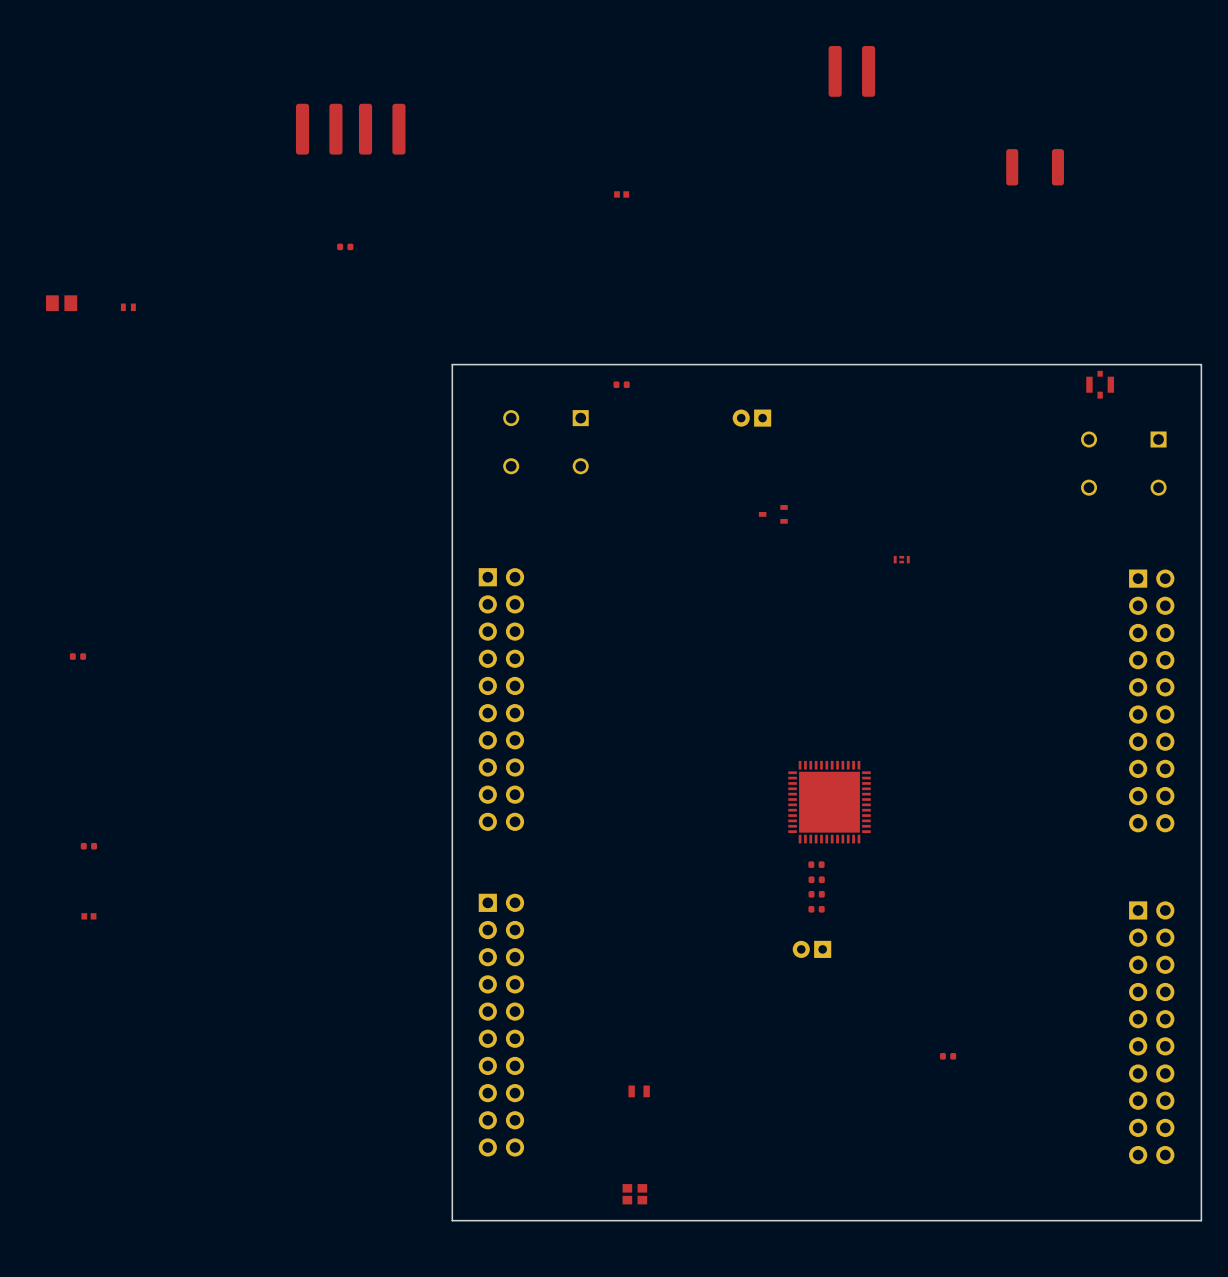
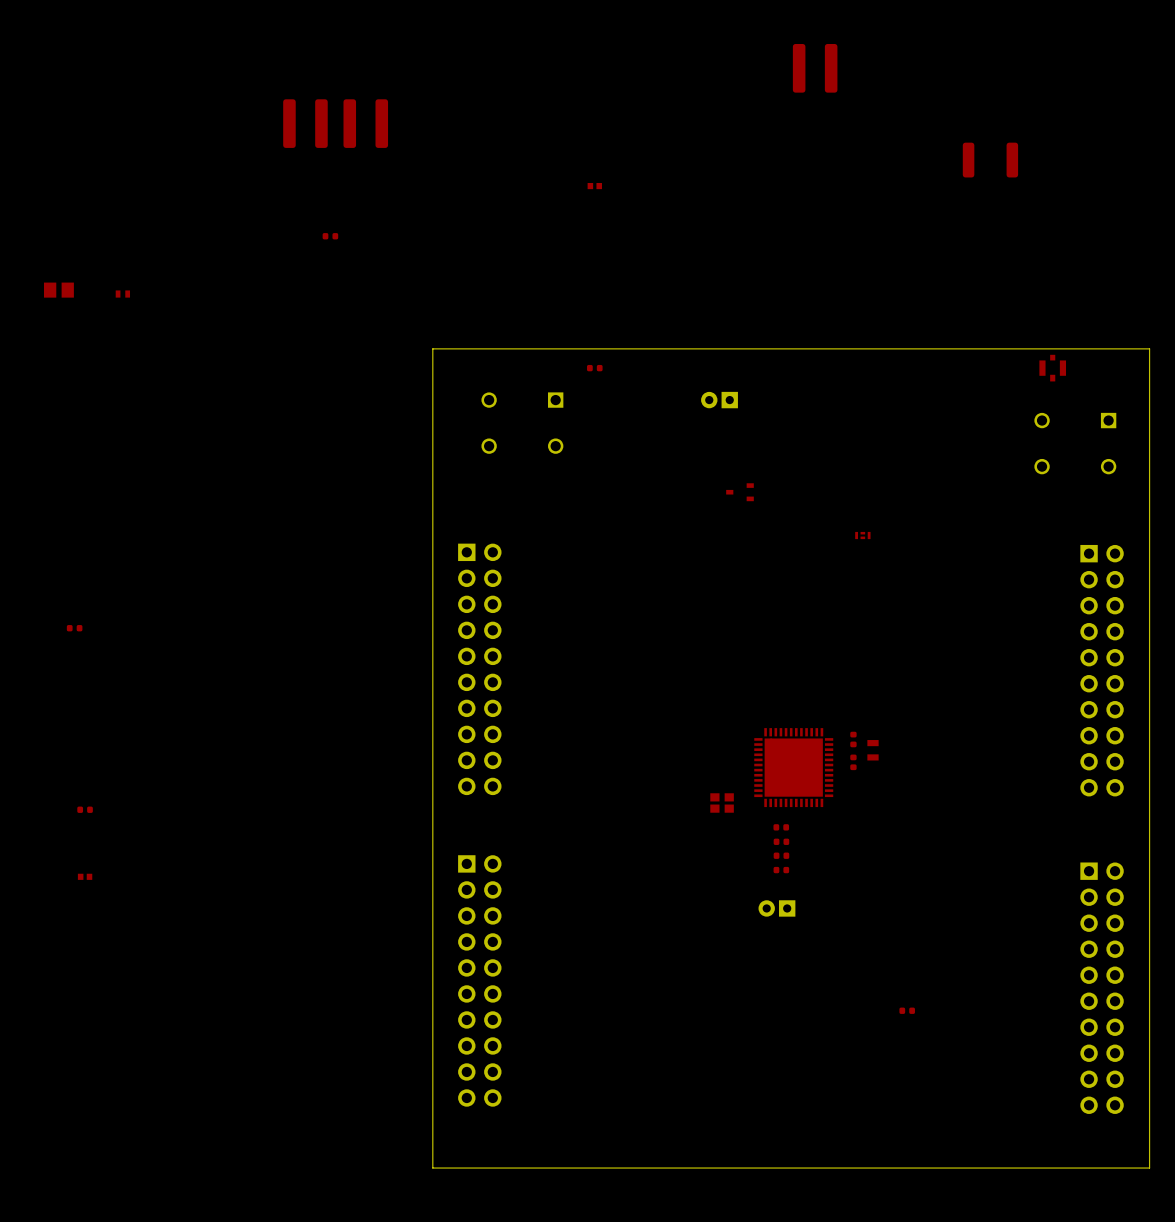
part: none -> (853, 739)
part: none -> (873, 750)
part: none -> (853, 762)
part: none -> (722, 802)
part: (639, 1091) -> none
part: (634, 1194) -> none

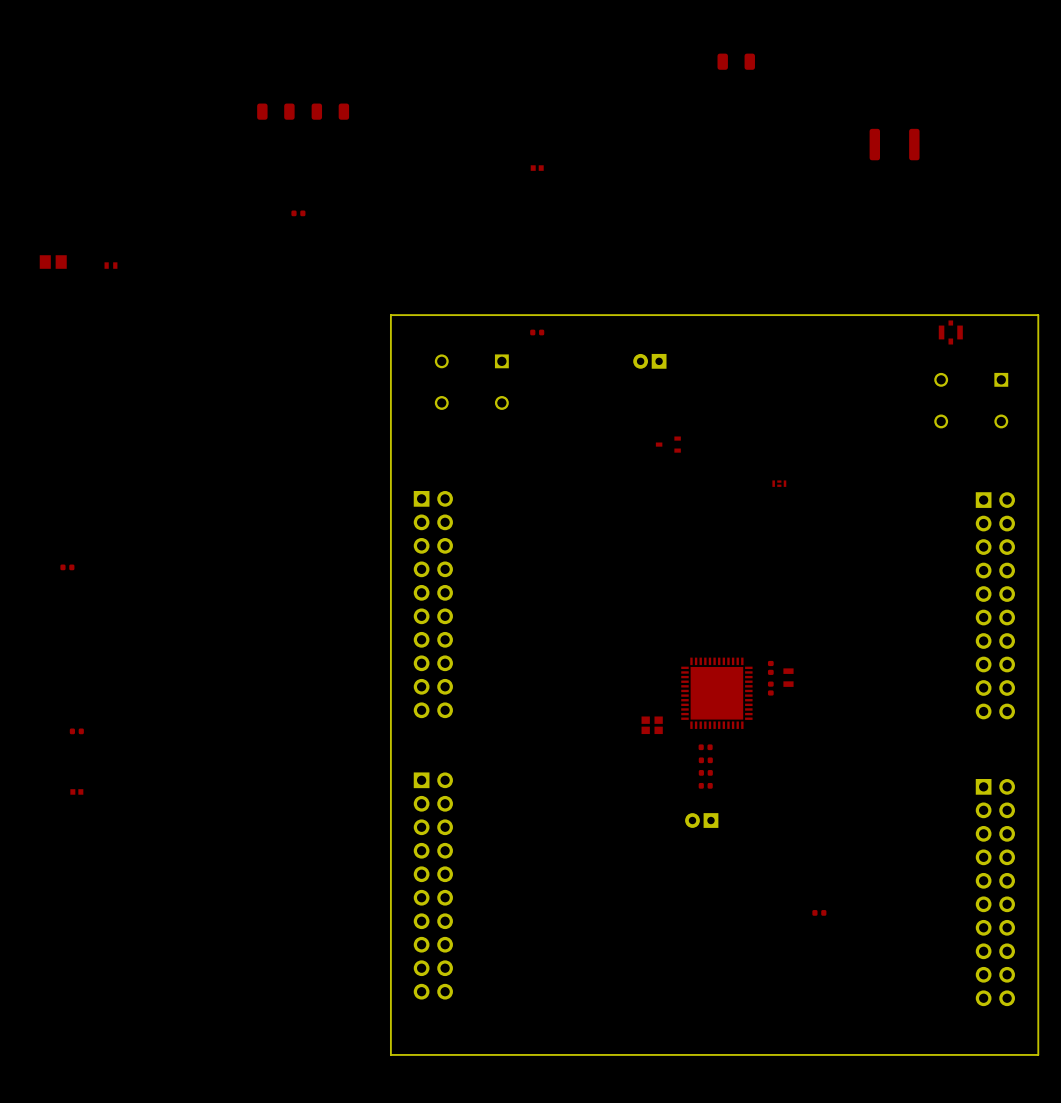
part footprint: [792, 43, 838, 93] -> [717, 53, 755, 70]
part footprint: [283, 99, 328, 148] -> [257, 103, 295, 120]
part footprint: [343, 99, 389, 148] -> [311, 103, 350, 120]

